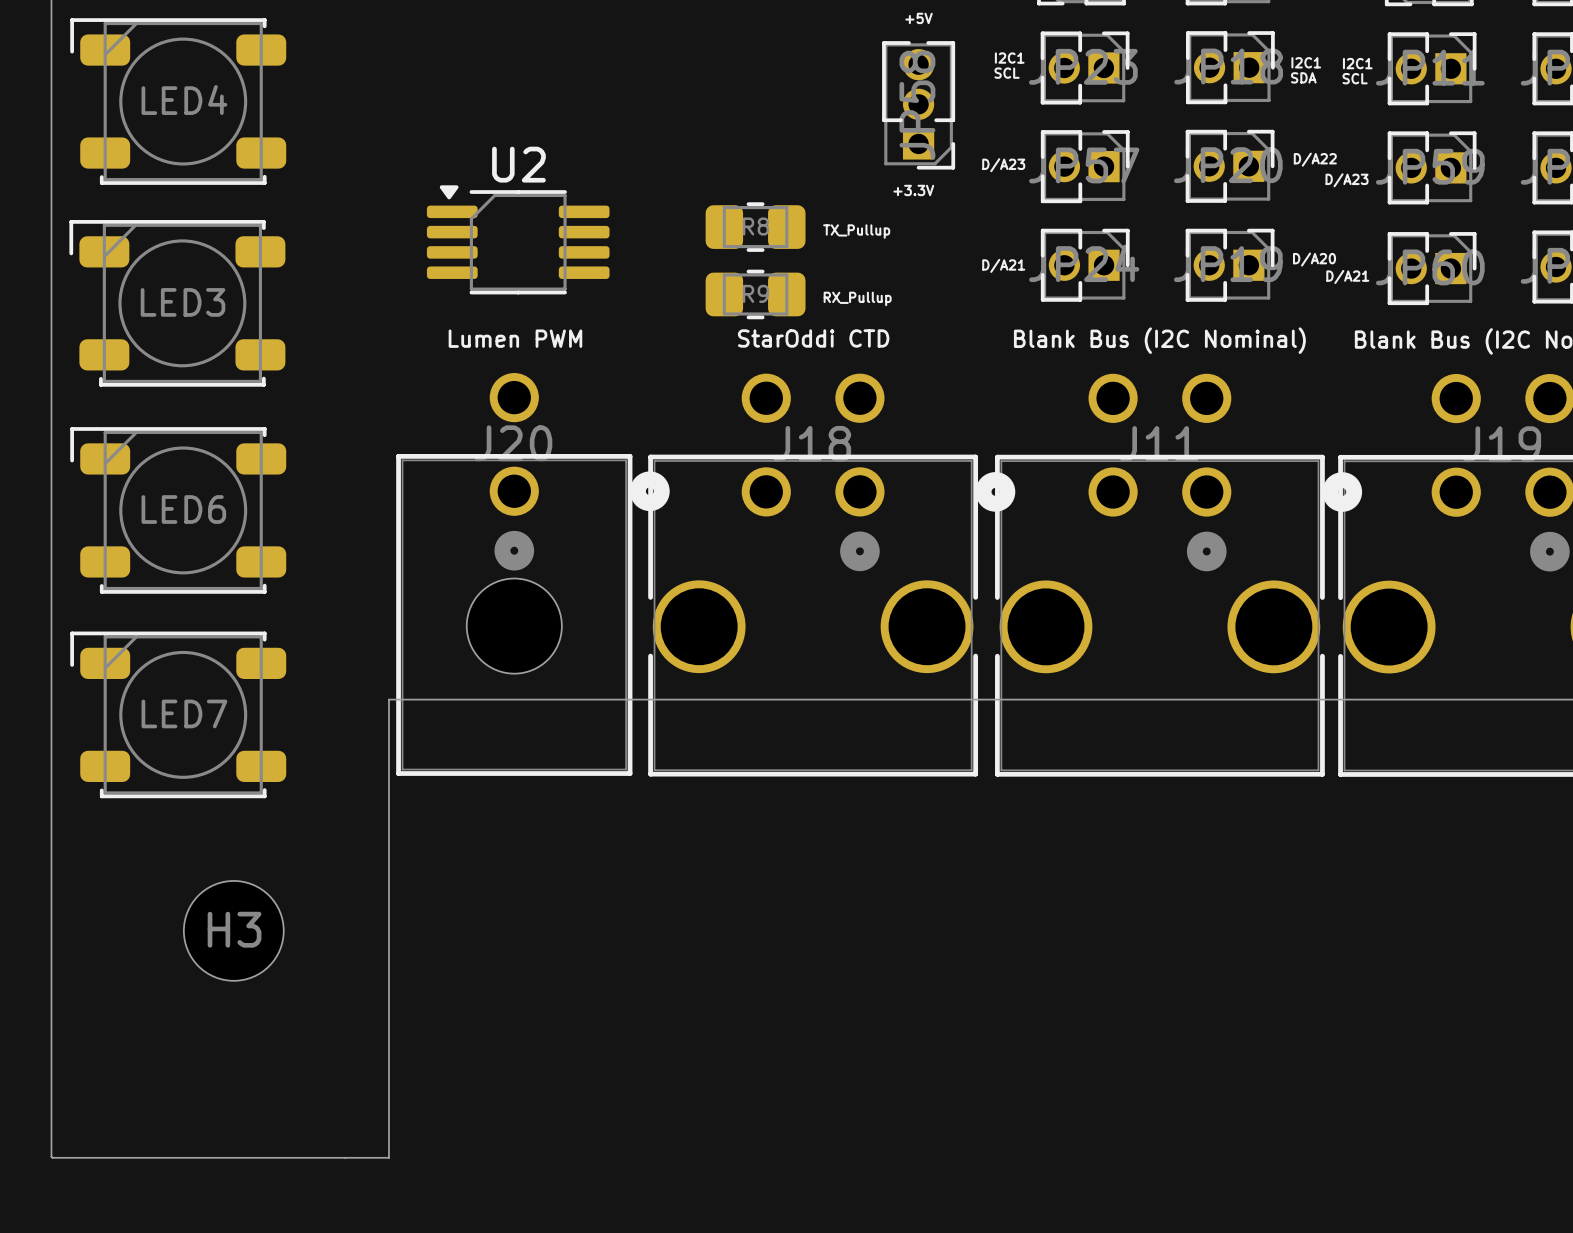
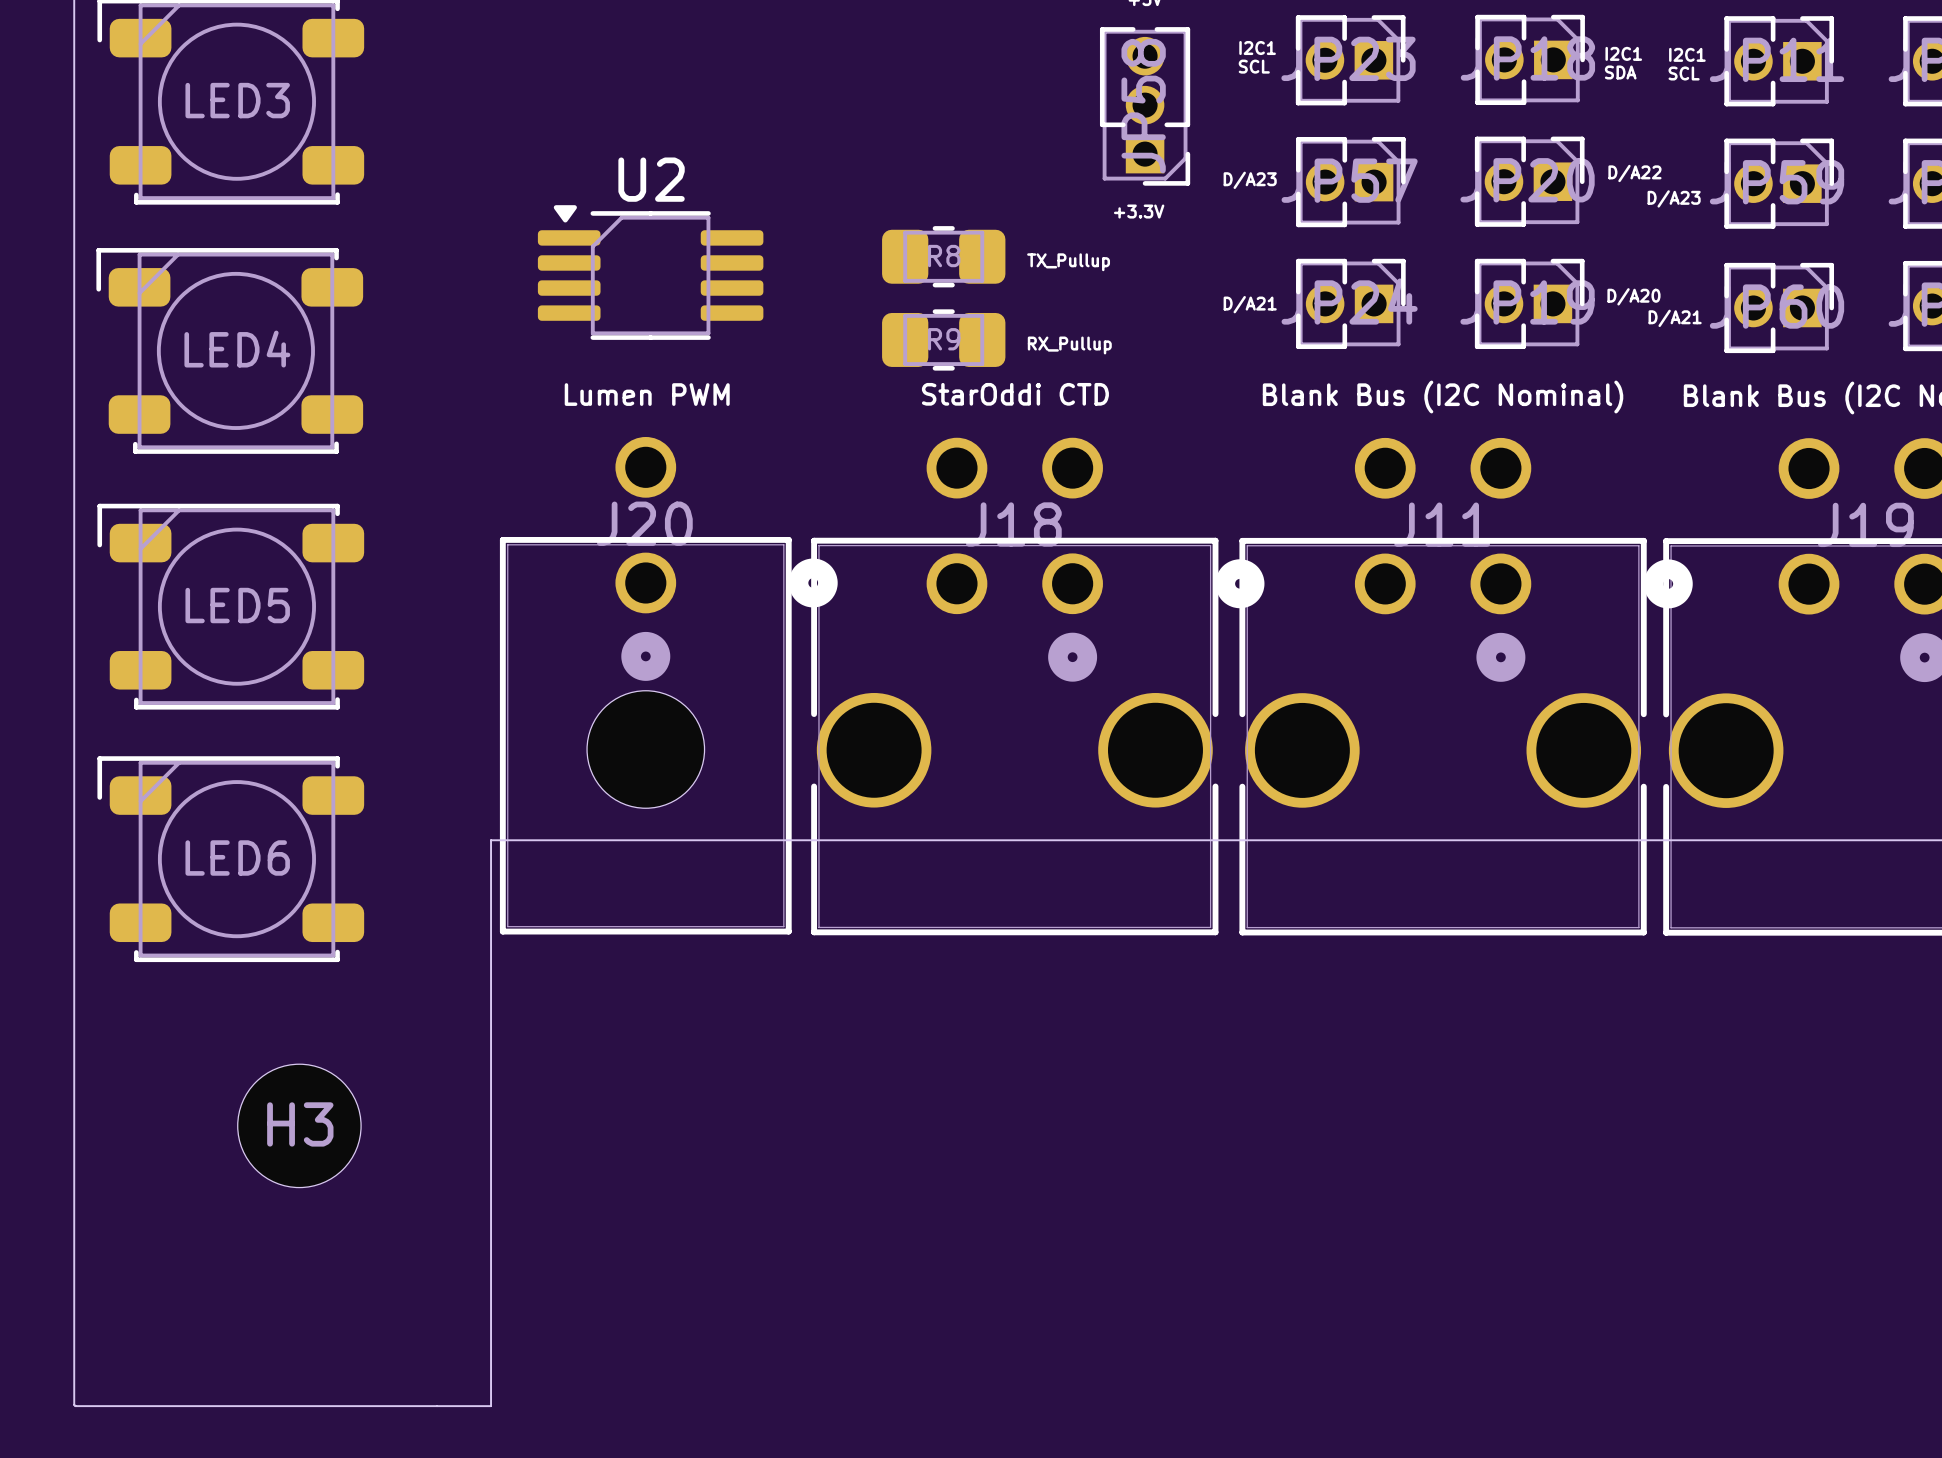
LED4 name: LED4 (184, 100) -> LED3 (237, 100)
LED3 name: LED3 (182, 302) -> LED4 (237, 349)
LED6 name: LED6 (183, 509) -> LED5 (237, 605)
LED7 name: LED7 (184, 713) -> LED6 (237, 858)

